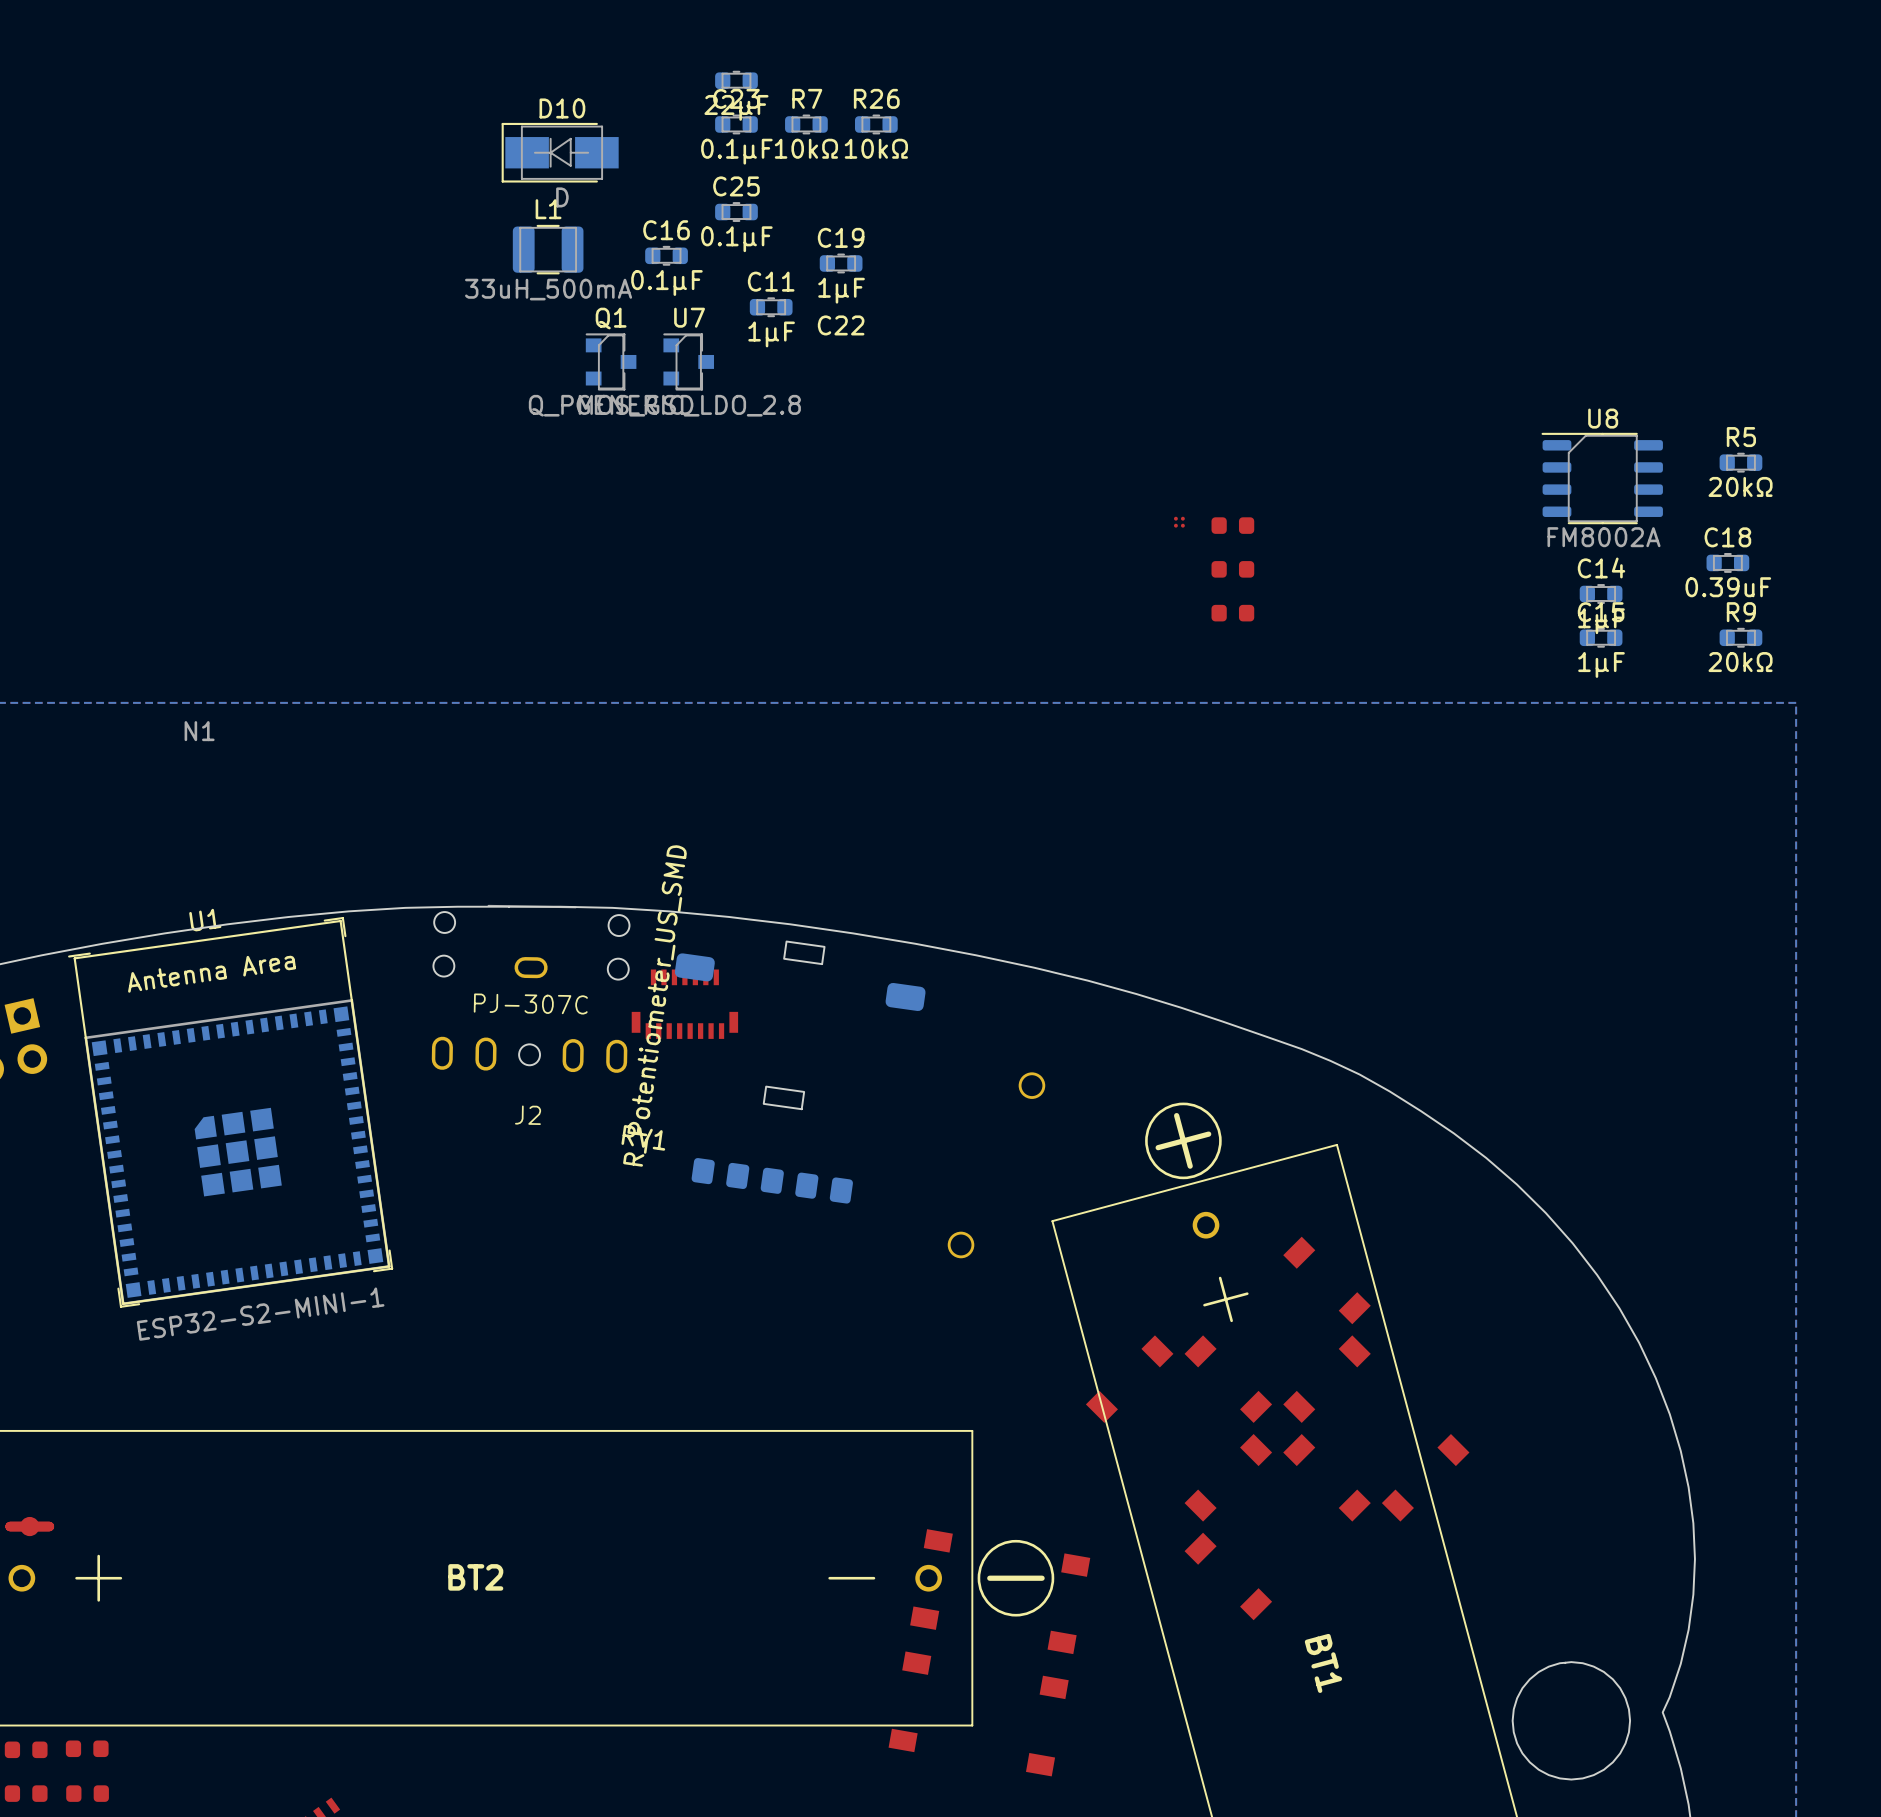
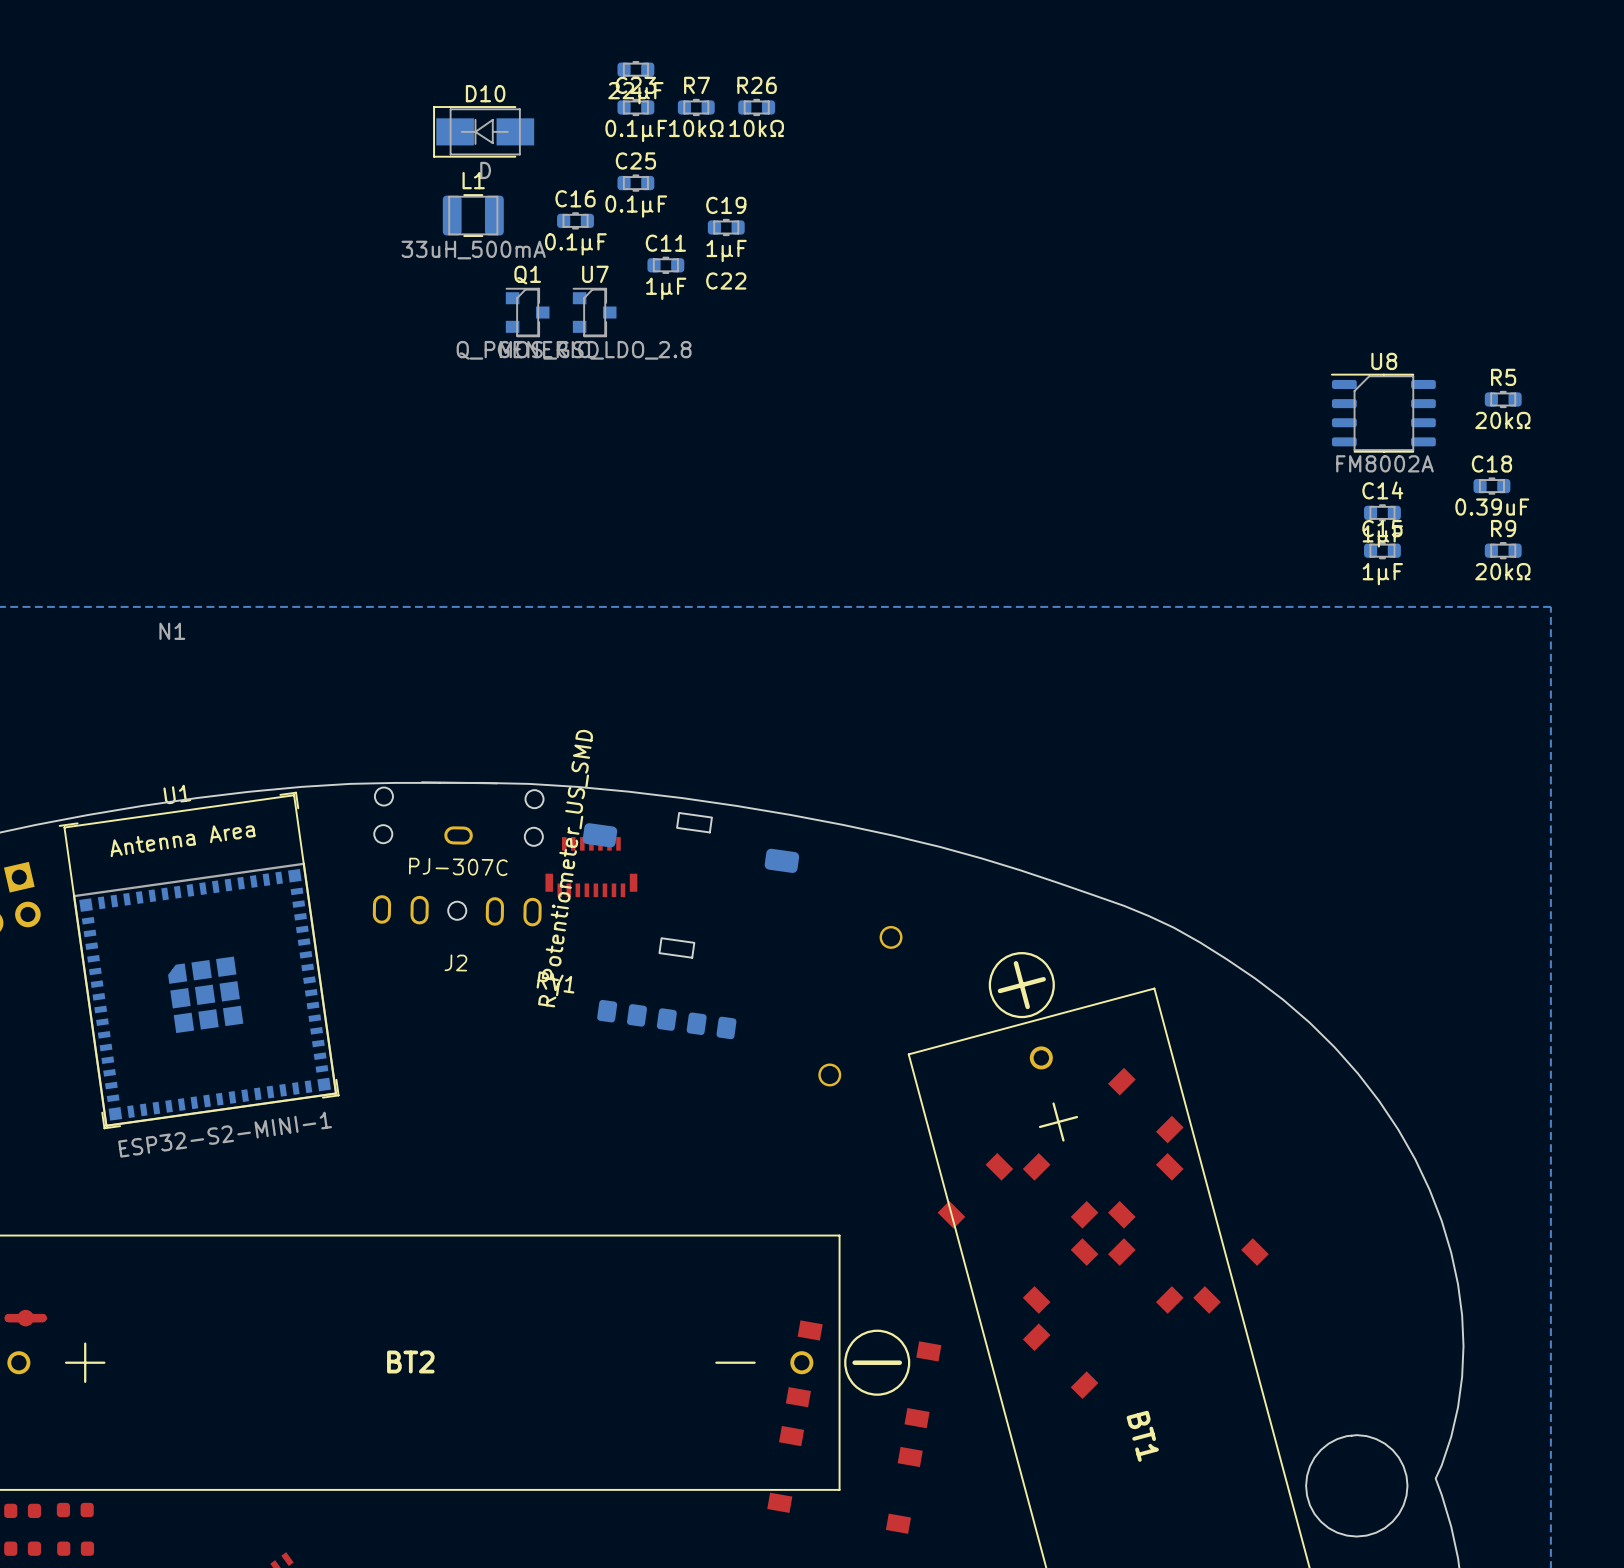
part: (1179, 522) -> none
part: (1232, 525) -> none
part: (1232, 569) -> none
part: (1232, 613) -> none

